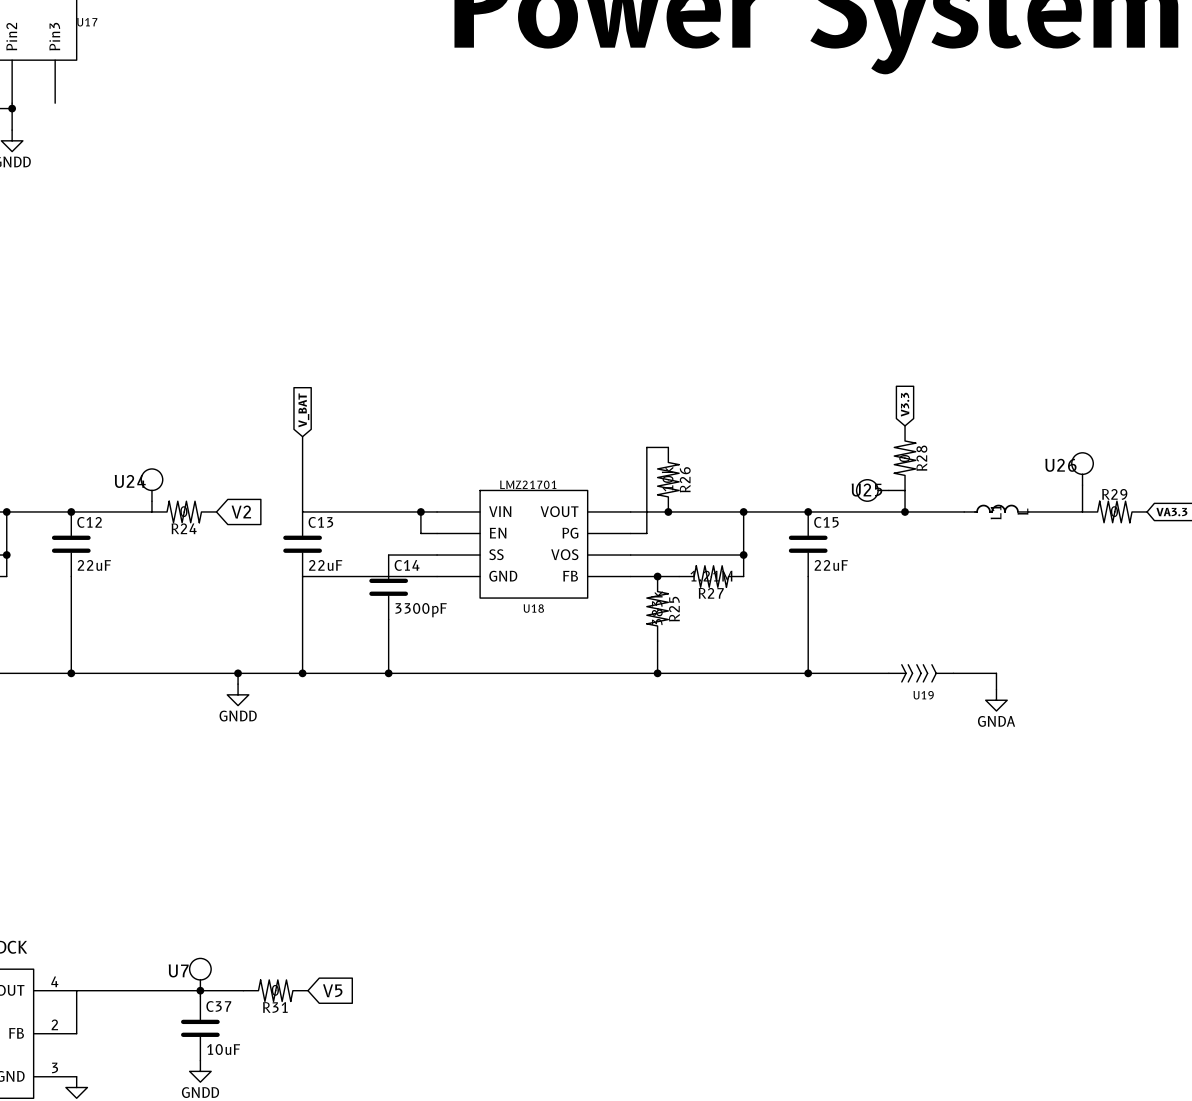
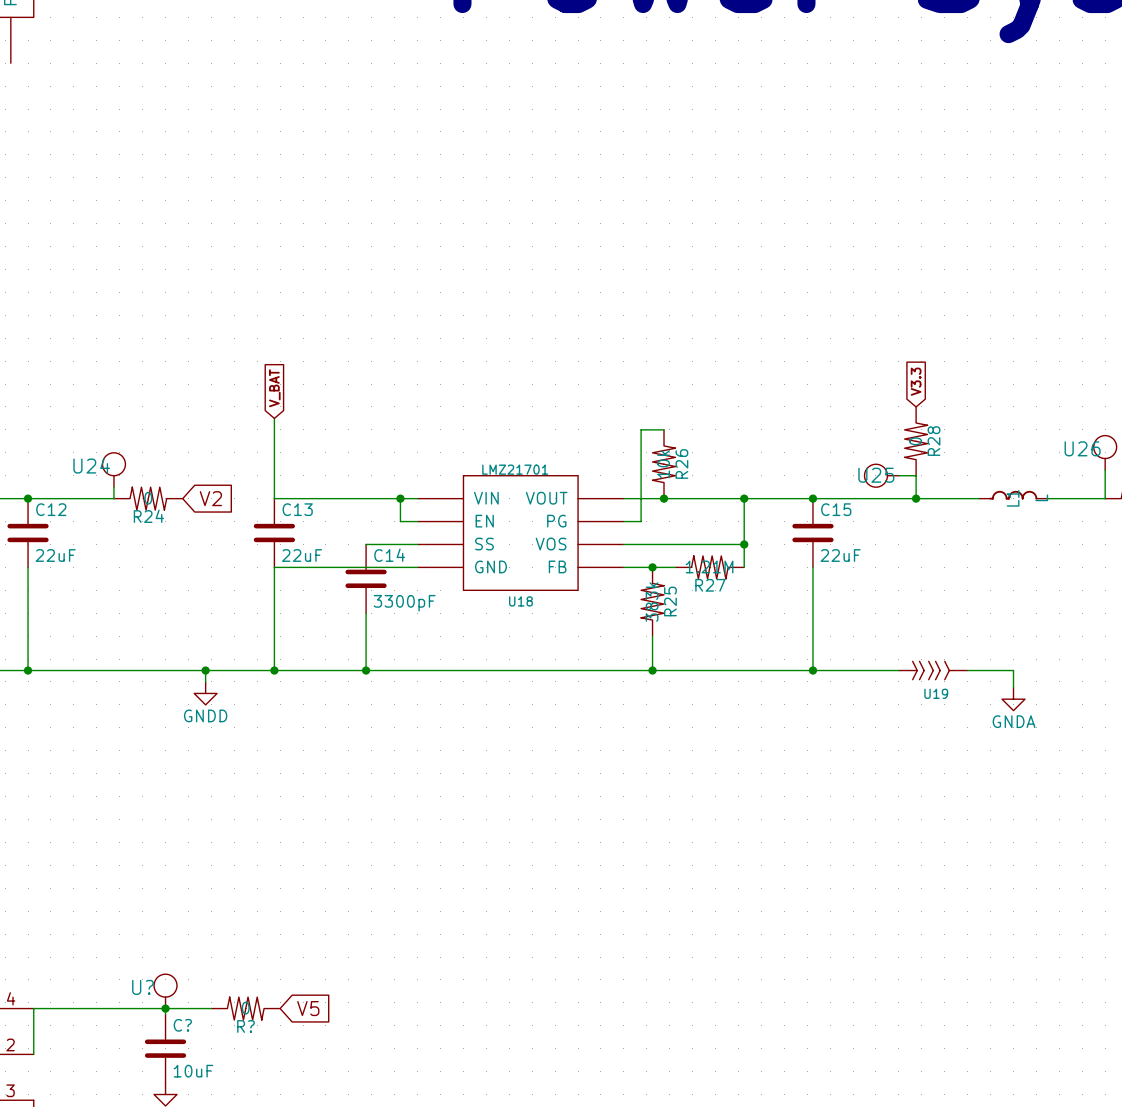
U7 name: U7 (178, 970) -> U? (142, 987)
C37 name: C37 (218, 1006) -> C? (182, 1025)
R31 name: R31 (275, 1007) -> R? (246, 1026)

